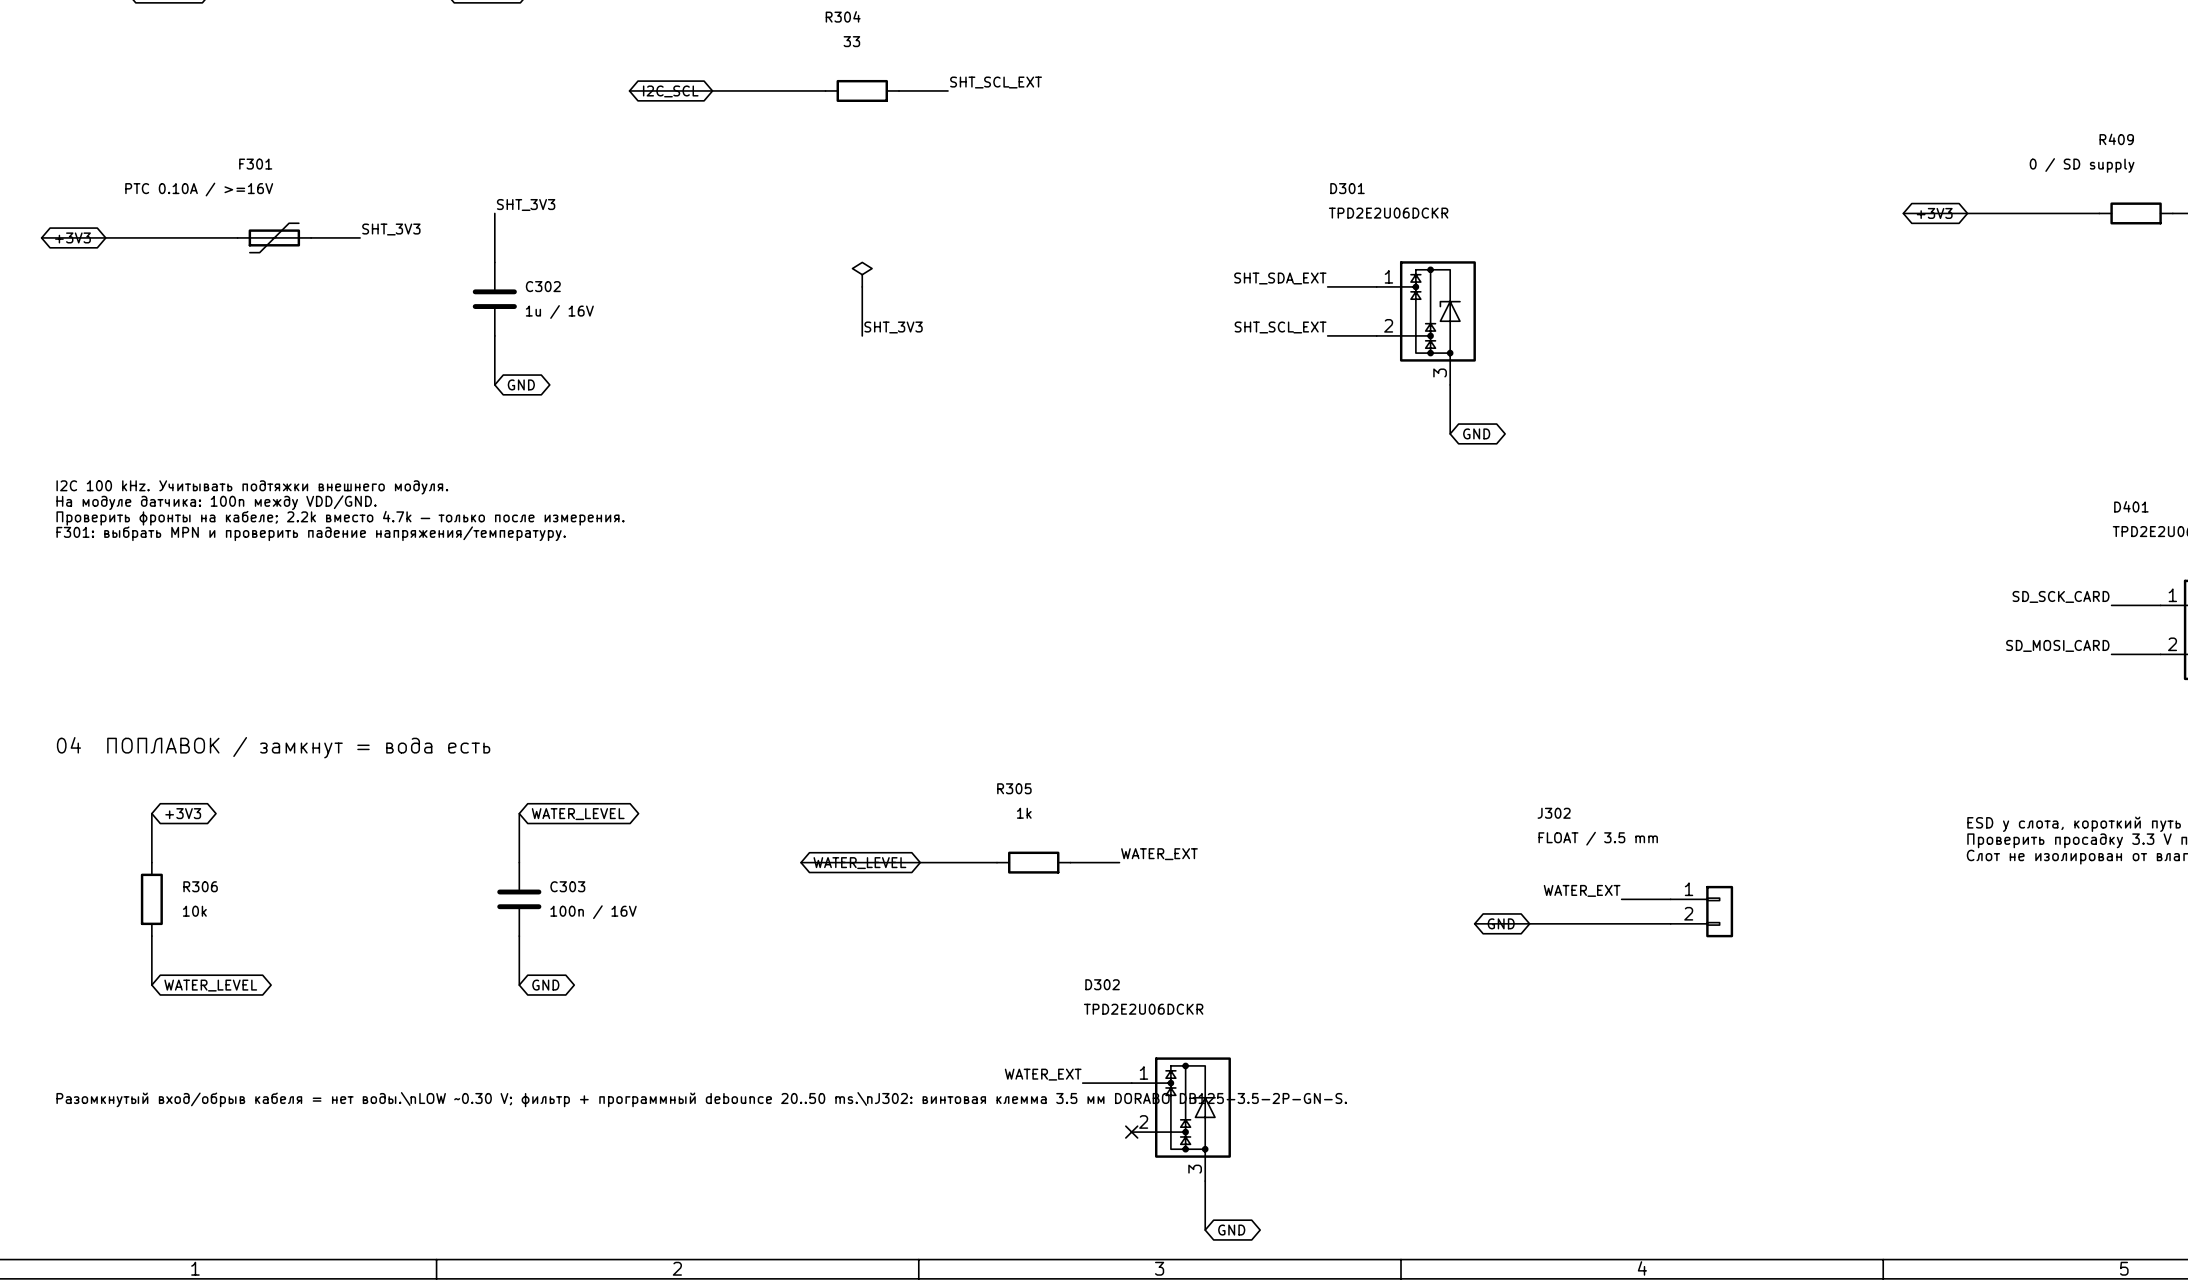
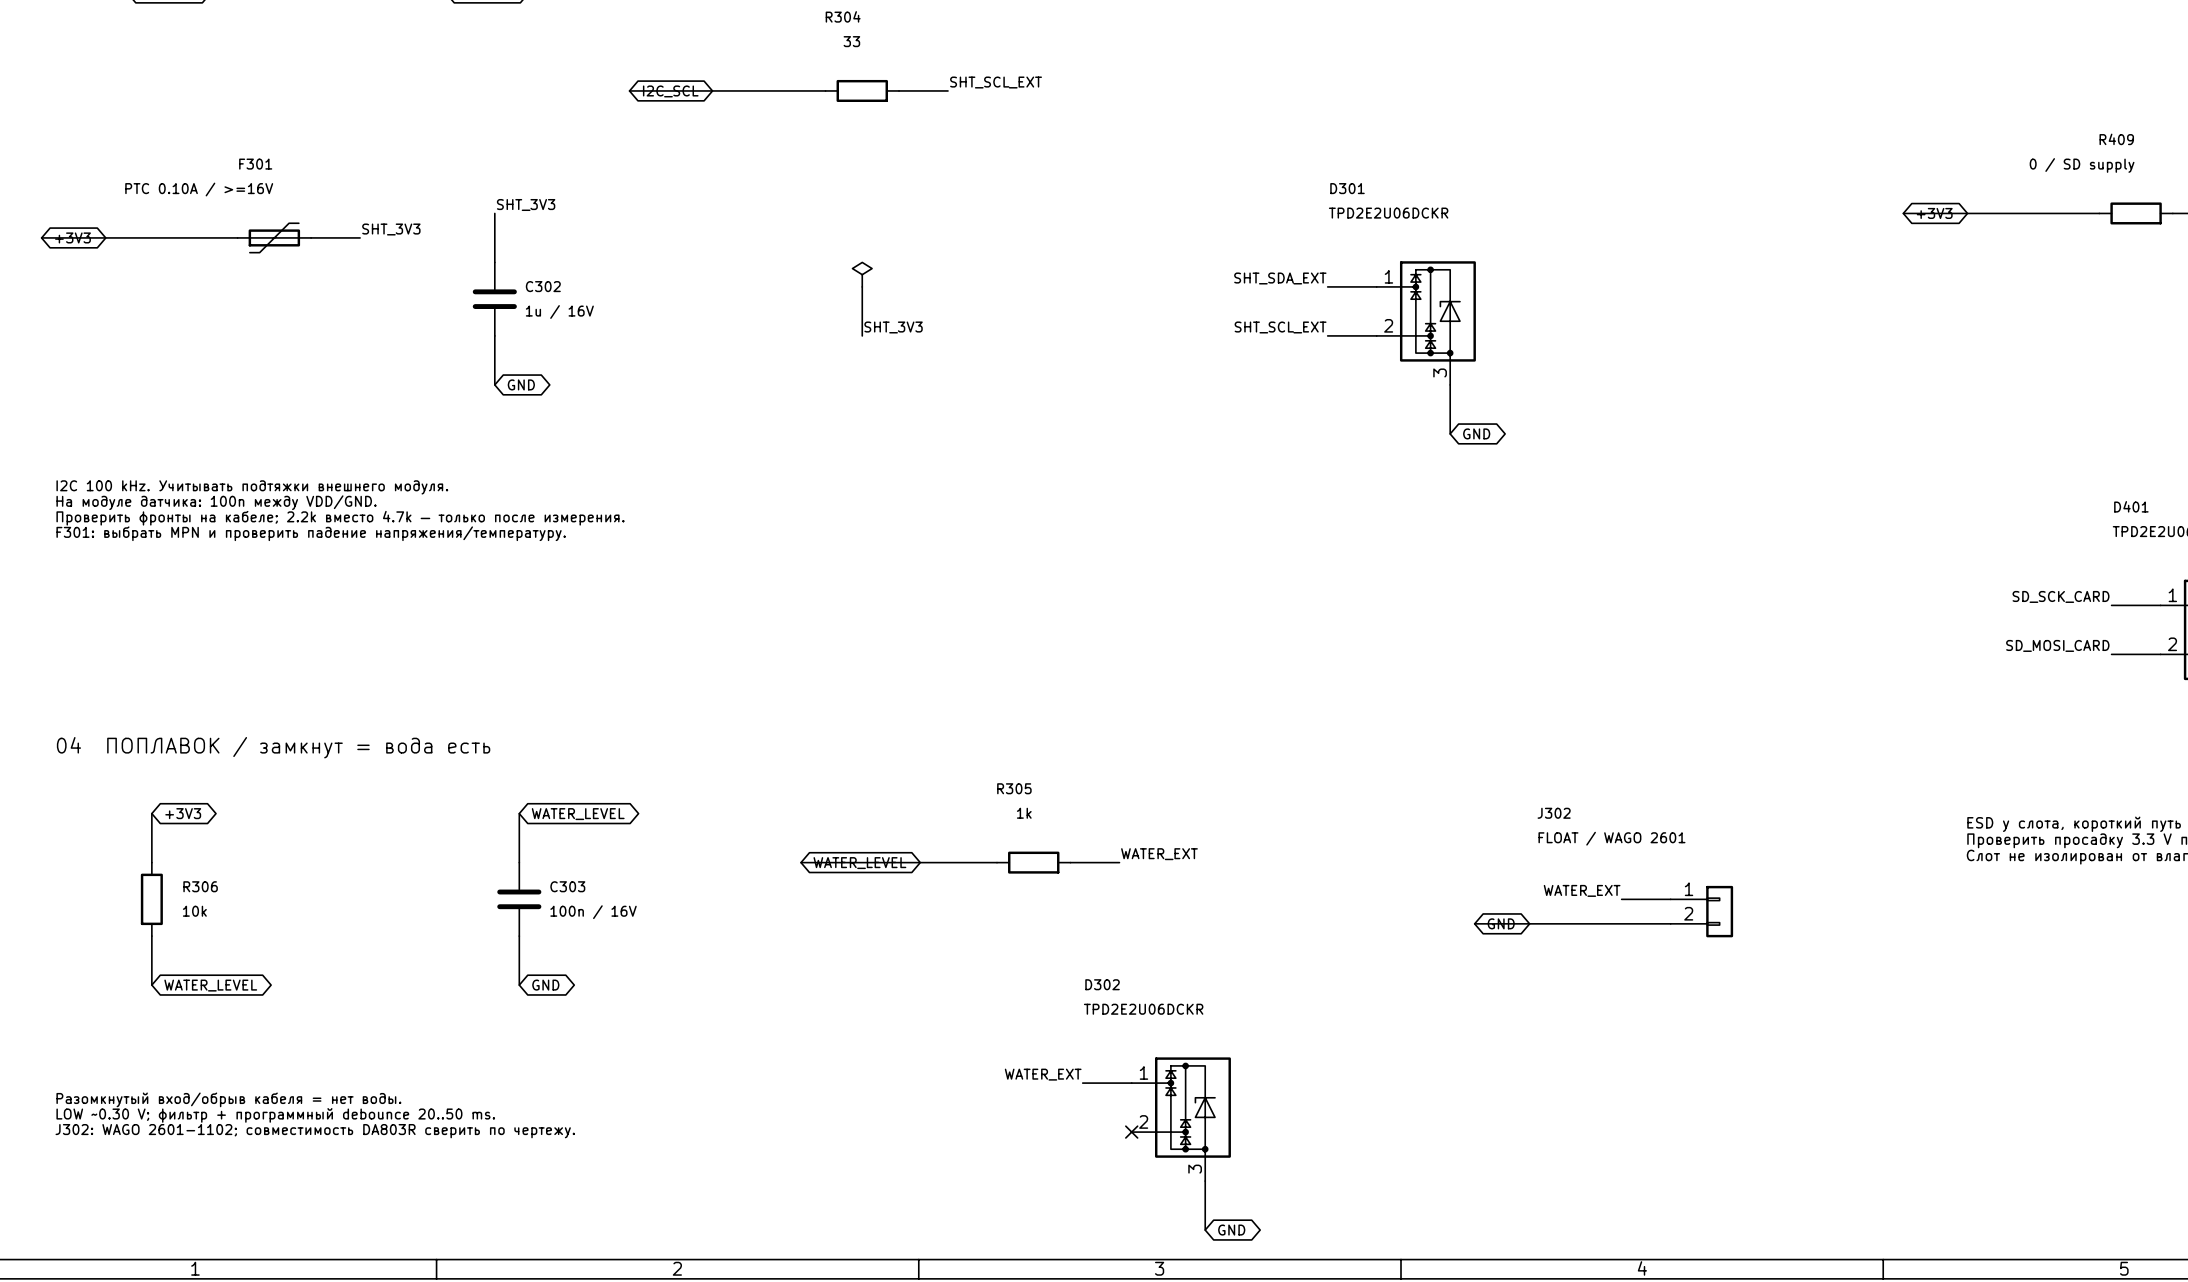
J302 value: FLOAT / 3.5 mm (1598, 838) -> FLOAT / WAGO 2601 (1611, 838)
text: Разомкнутый вход/обрыв кабеля = нет воды.\nLOW ~0.30 V; фильтр + программный debounce 20..50 ms.\nJ302: винтовая клемма 3.5 мм DORABO DB125-3.5-2P-GN-S. (701, 1099) -> Разомкнутый вход/обрыв кабеля = нет воды. (228, 1099)
text: none -> LOW ~0.30 V; фильтр + программный debounce 20..50 ms. (275, 1115)
text: none -> J302: WAGO 2601-1102; совместимость DA803R сверить по чертежу. (315, 1131)

